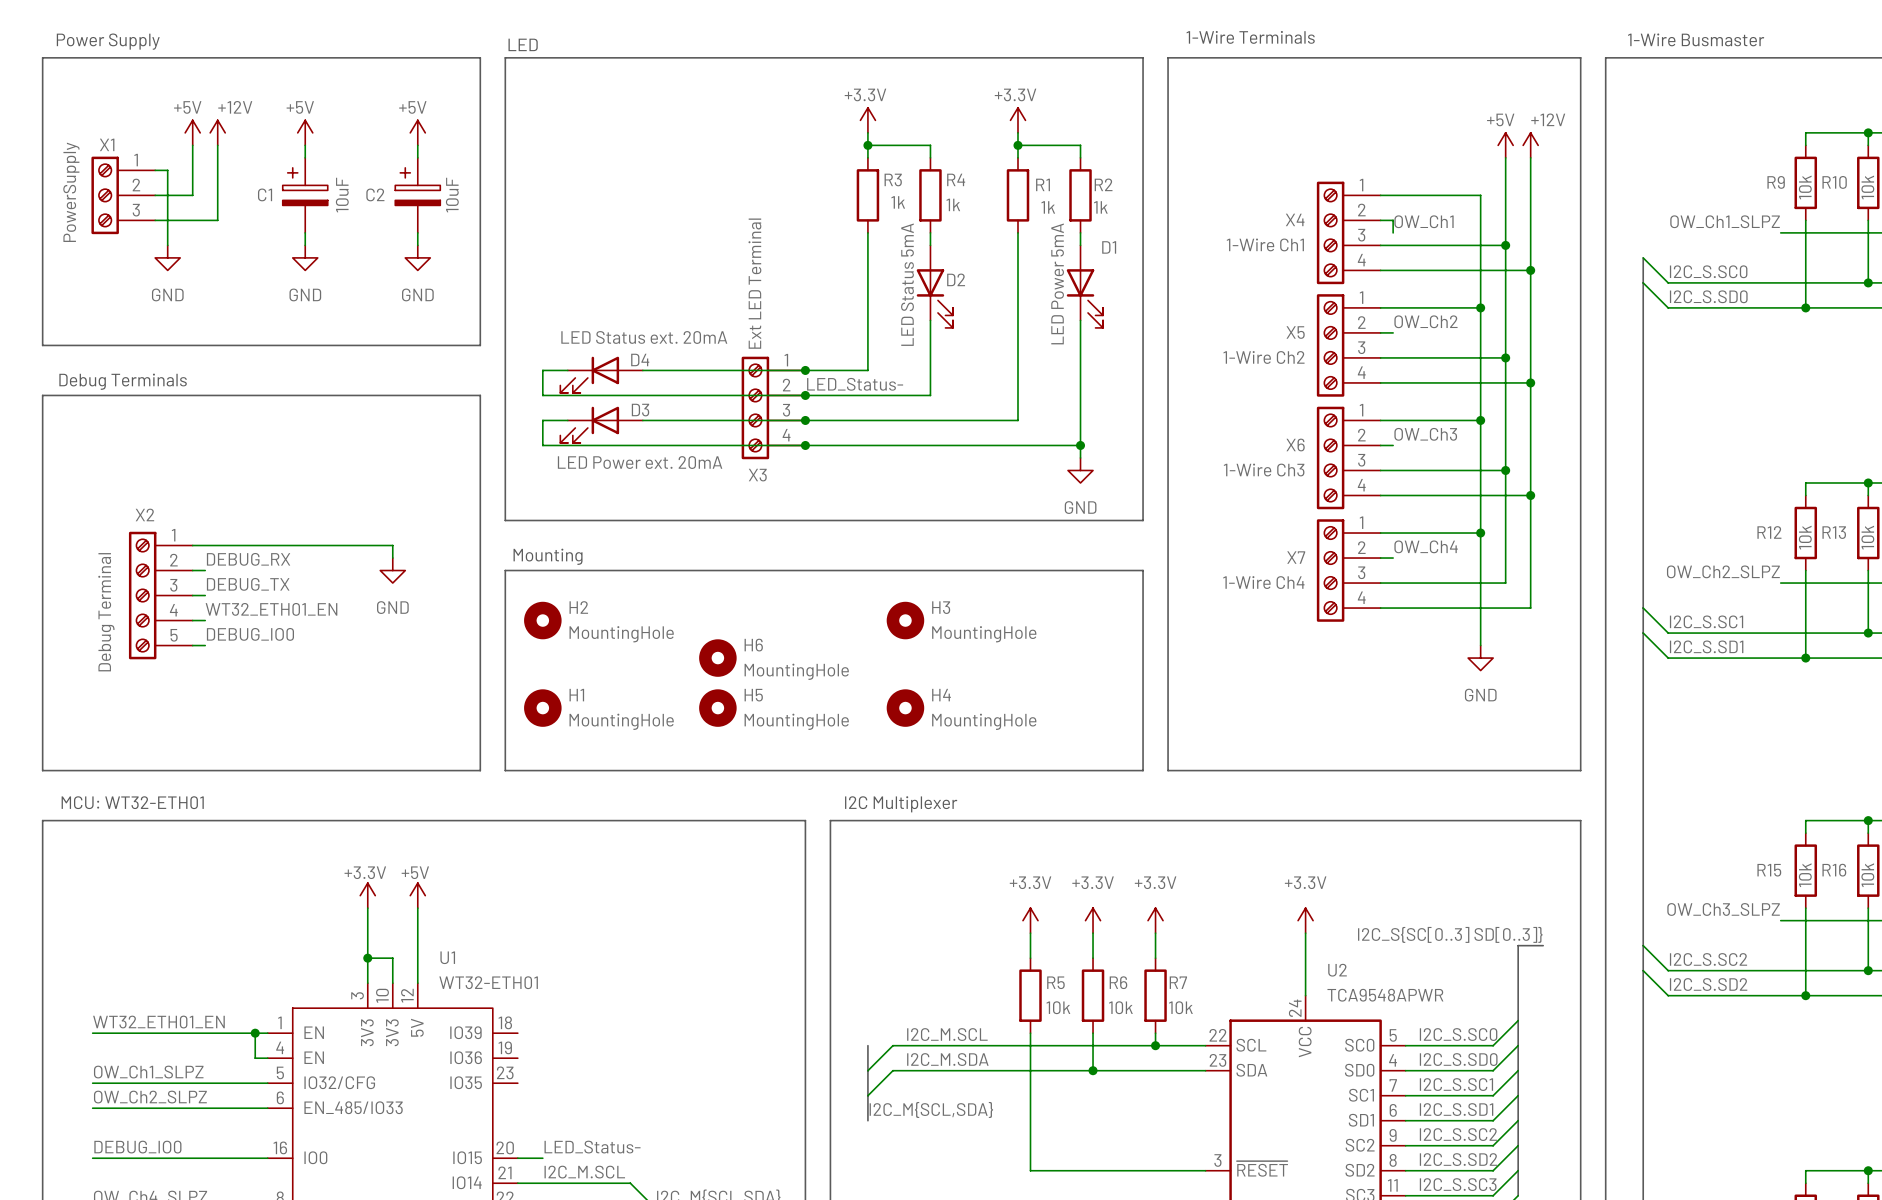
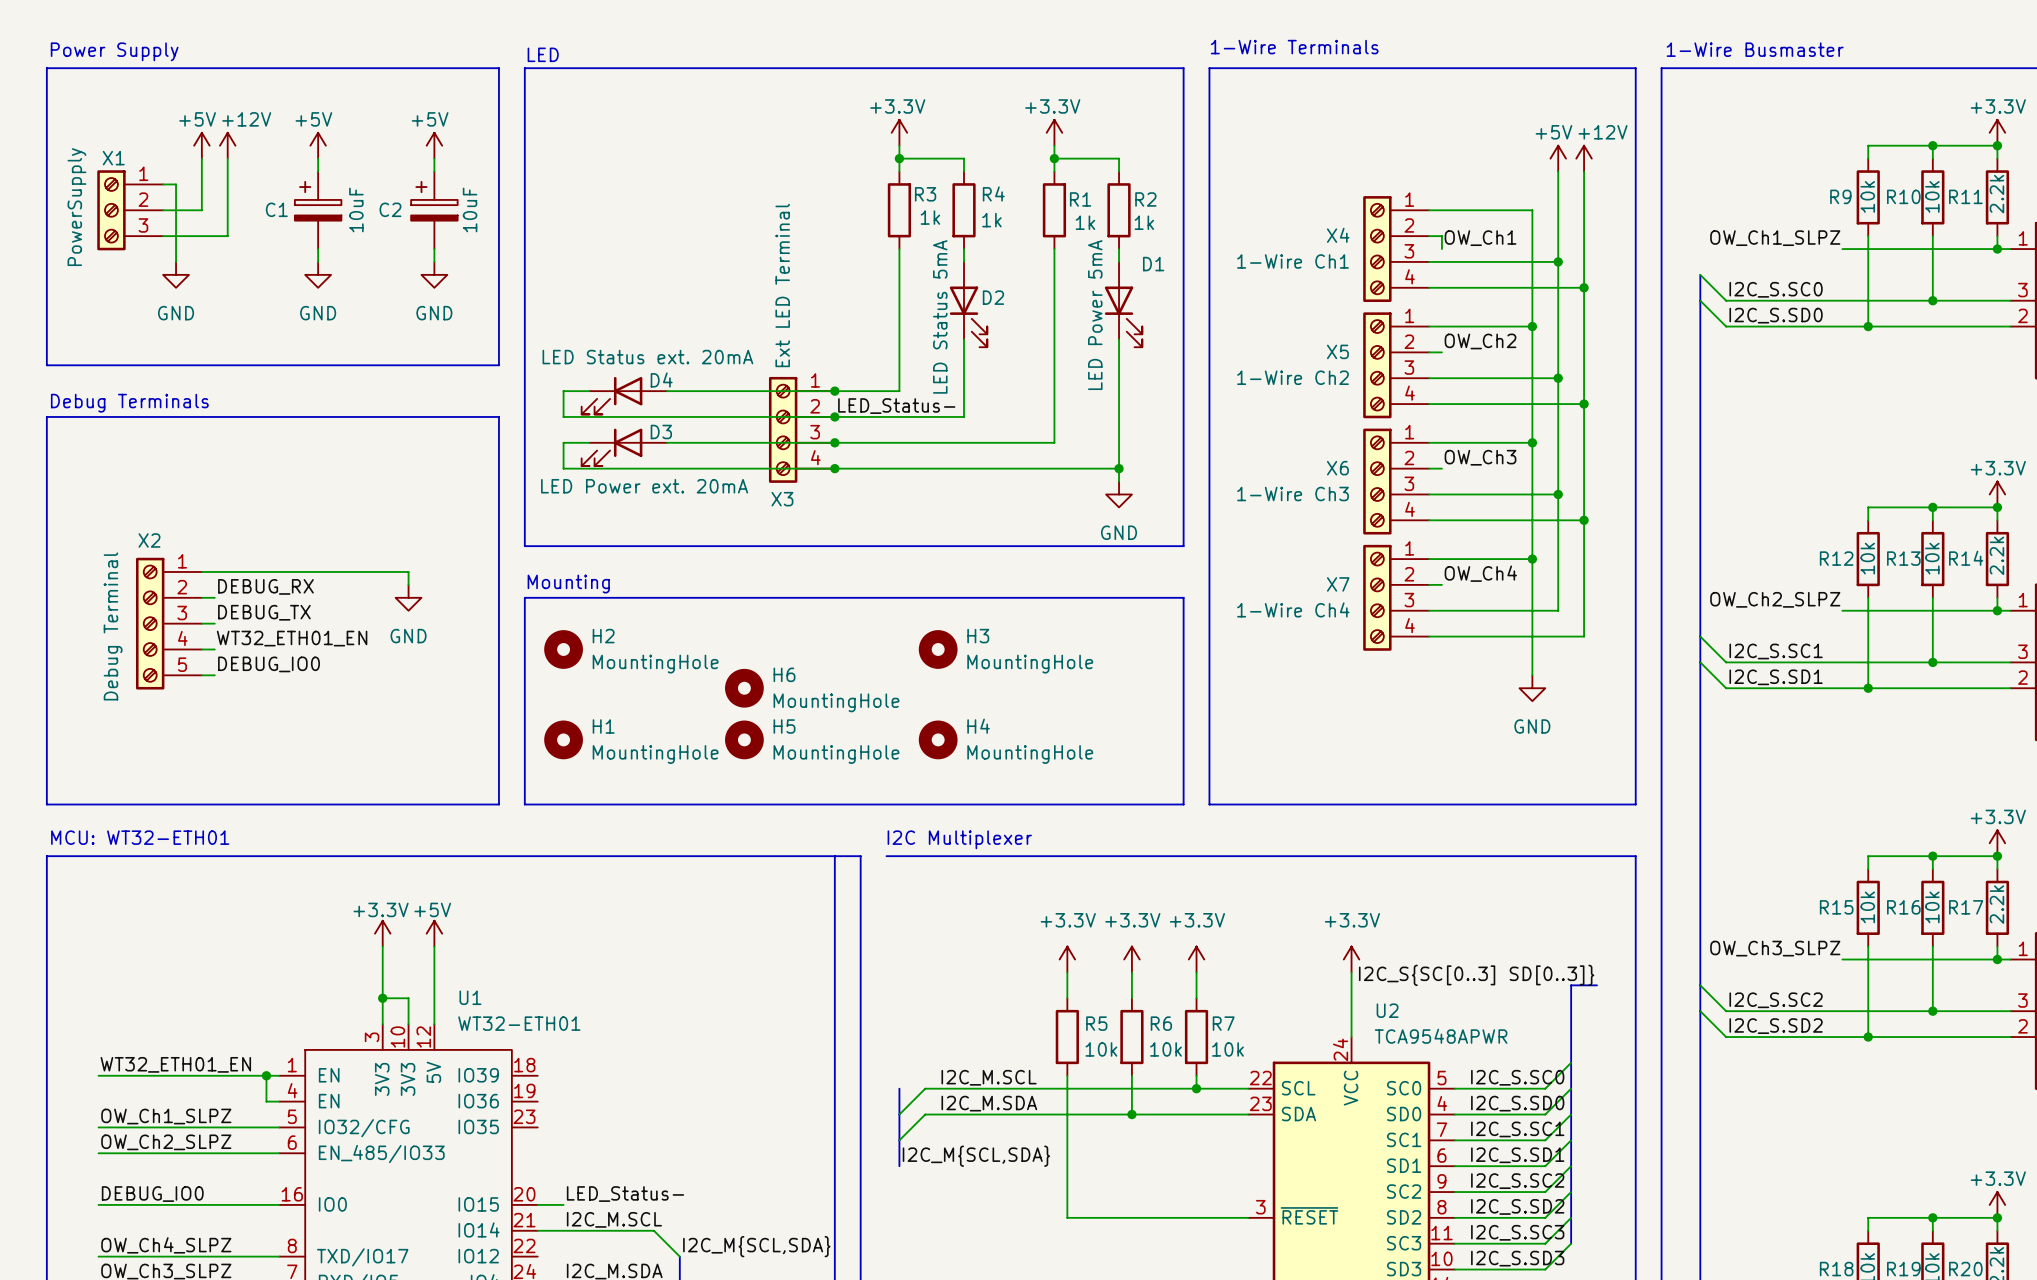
text position: I2C Multiplexer (901, 804) -> I2C Multiplexer (959, 839)
line: (830, 820) (855, 820) -> (860, 856) (834, 856)

